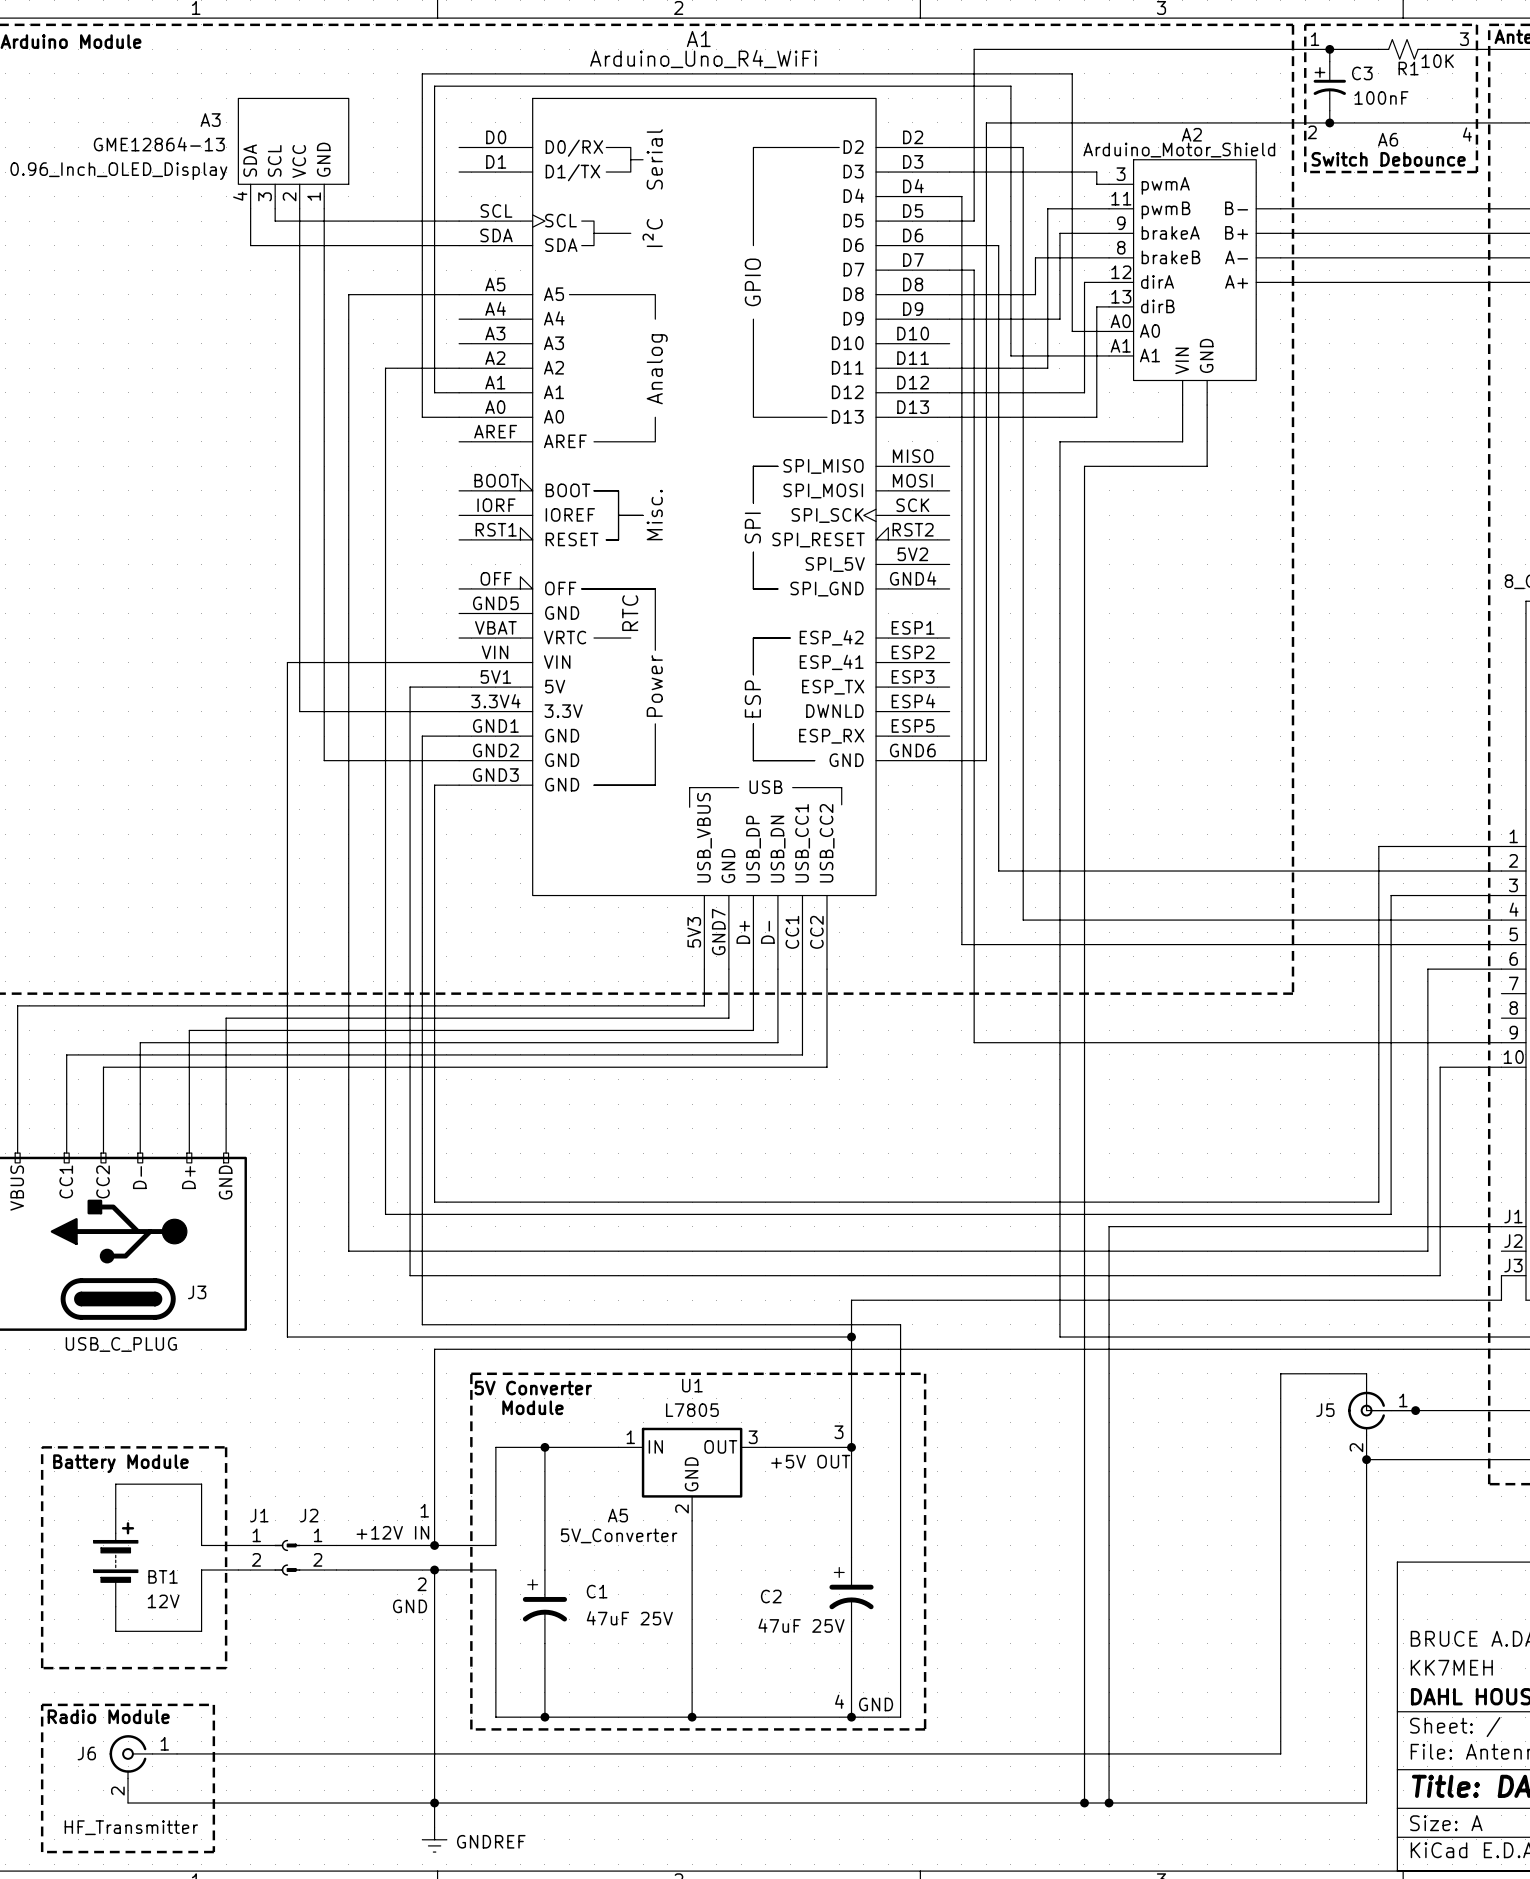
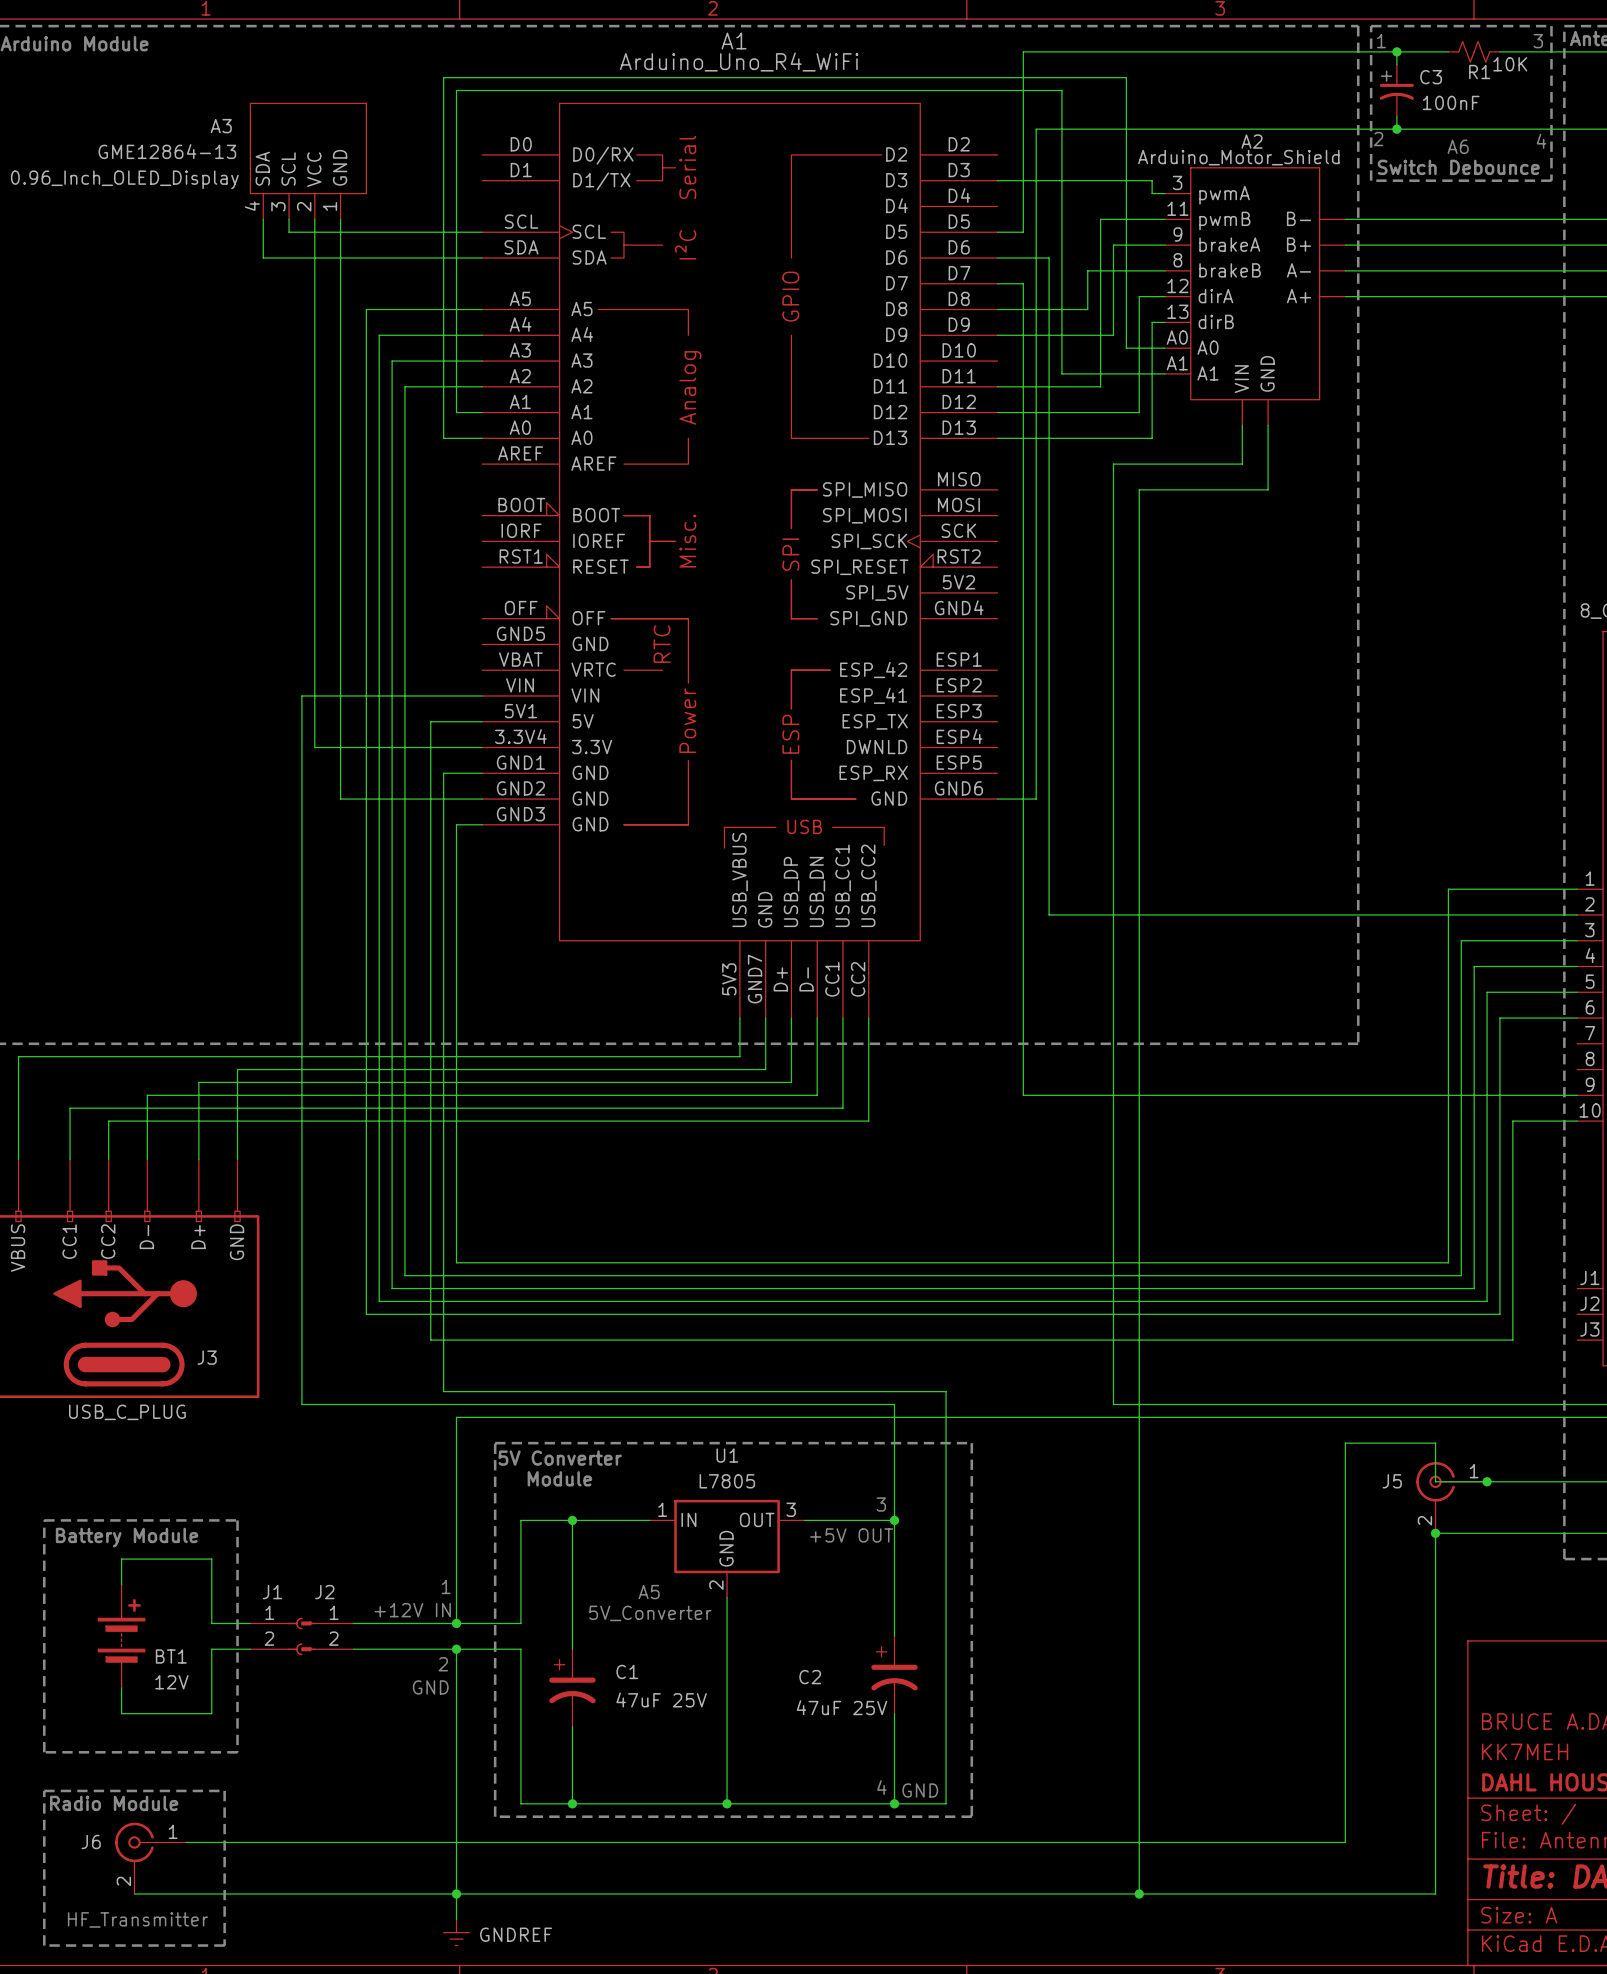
wire: (949, 147) (1023, 147) (1023, 920) (1403, 920) -> none
wire: (949, 196) (961, 196) (961, 944) (1415, 944) -> (482, 335) (379, 335) (379, 1301) (1487, 1301) (1487, 992)
wire: (1109, 1226) (1109, 1803) -> (1165, 1288) (392, 1288) (392, 361) (482, 361)
wire: (1403, 1226) (1501, 1226) -> (1474, 1288) (1474, 966)
wire: (1501, 1275) (1501, 1300) (851, 1300) (851, 1337) -> none
junction: (851, 1337) -> none
junction: (1109, 1803) -> none

